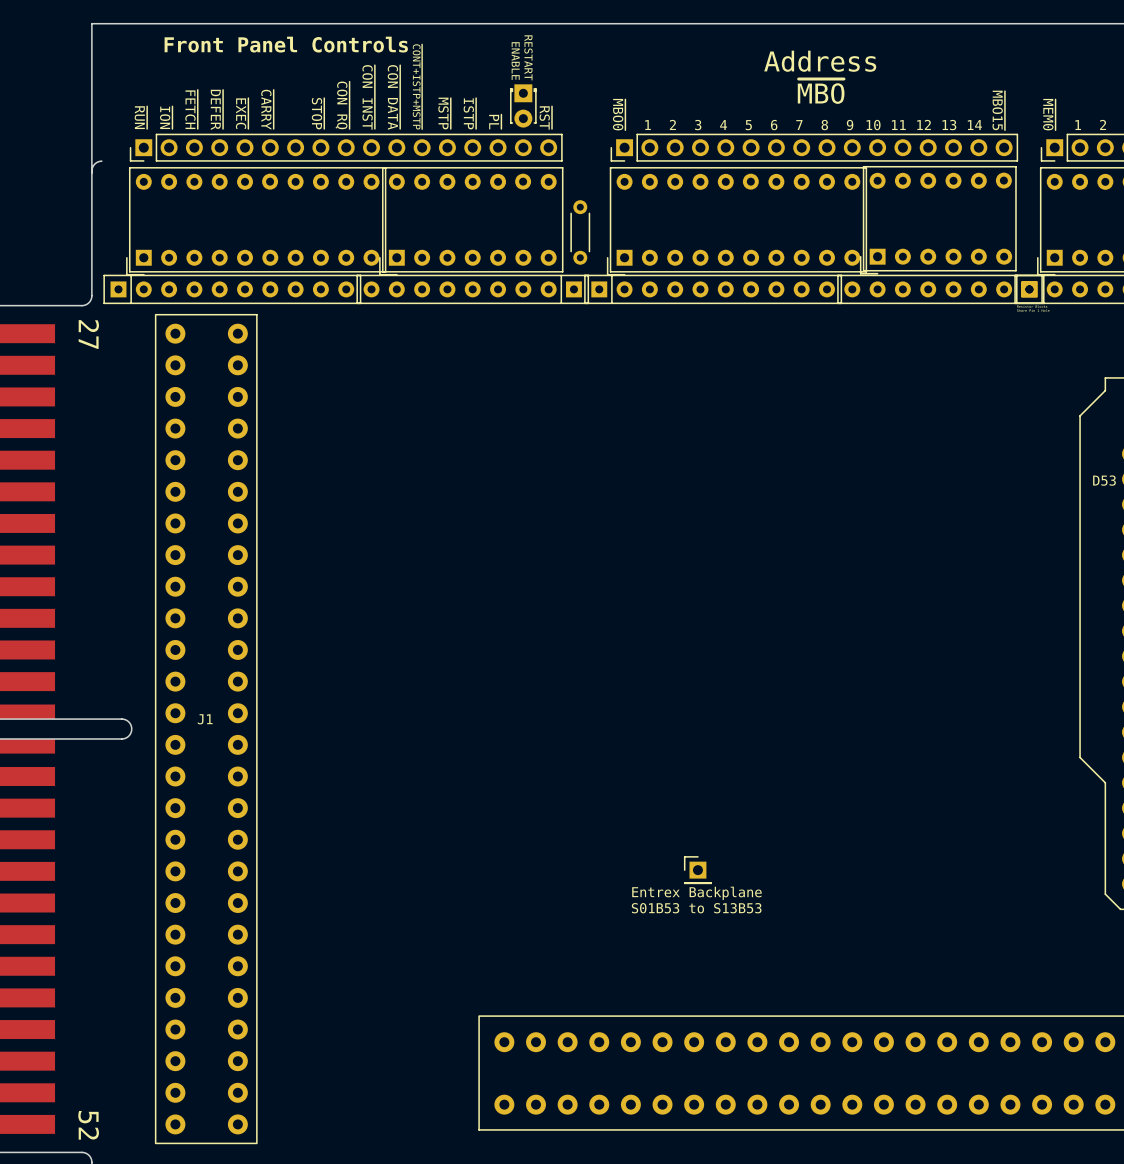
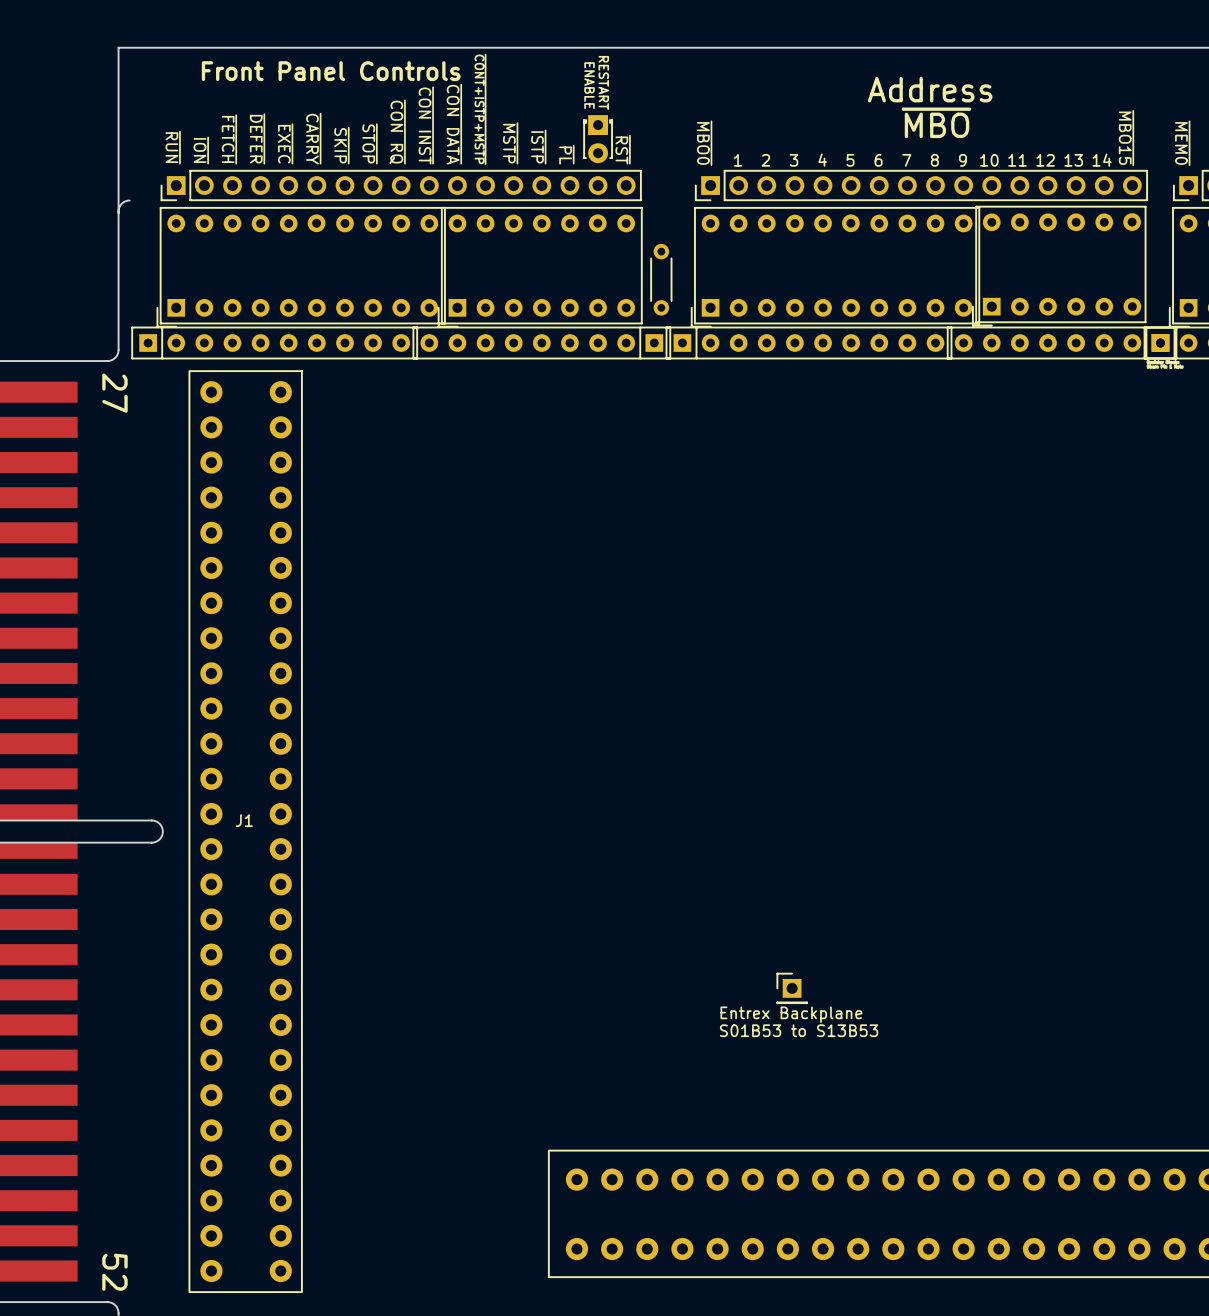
text: none -> ~{SKIP} (341, 145)

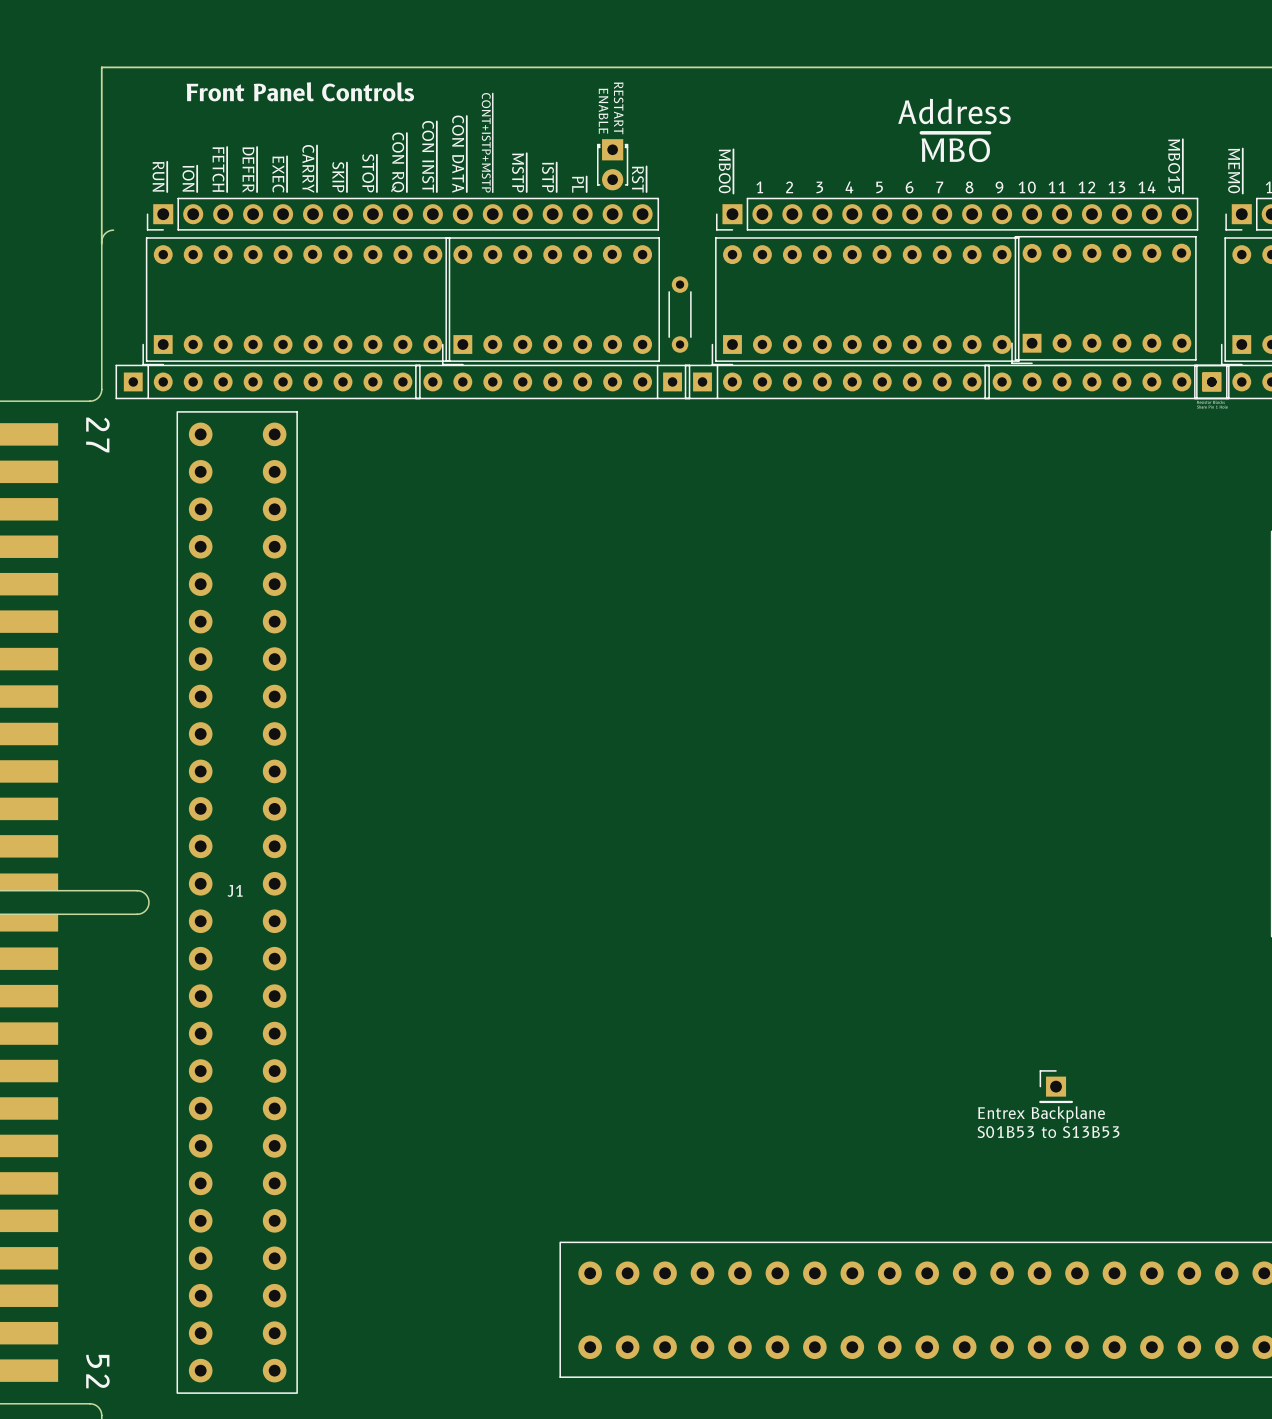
part position: (792, 988) -> (1056, 1086)
text position: Entrex Backplane (791, 1014) -> Entrex Backplane (1041, 1114)
text position: S01B53 to S13B53 (799, 1030) -> S01B53 to S13B53 (1048, 1132)

